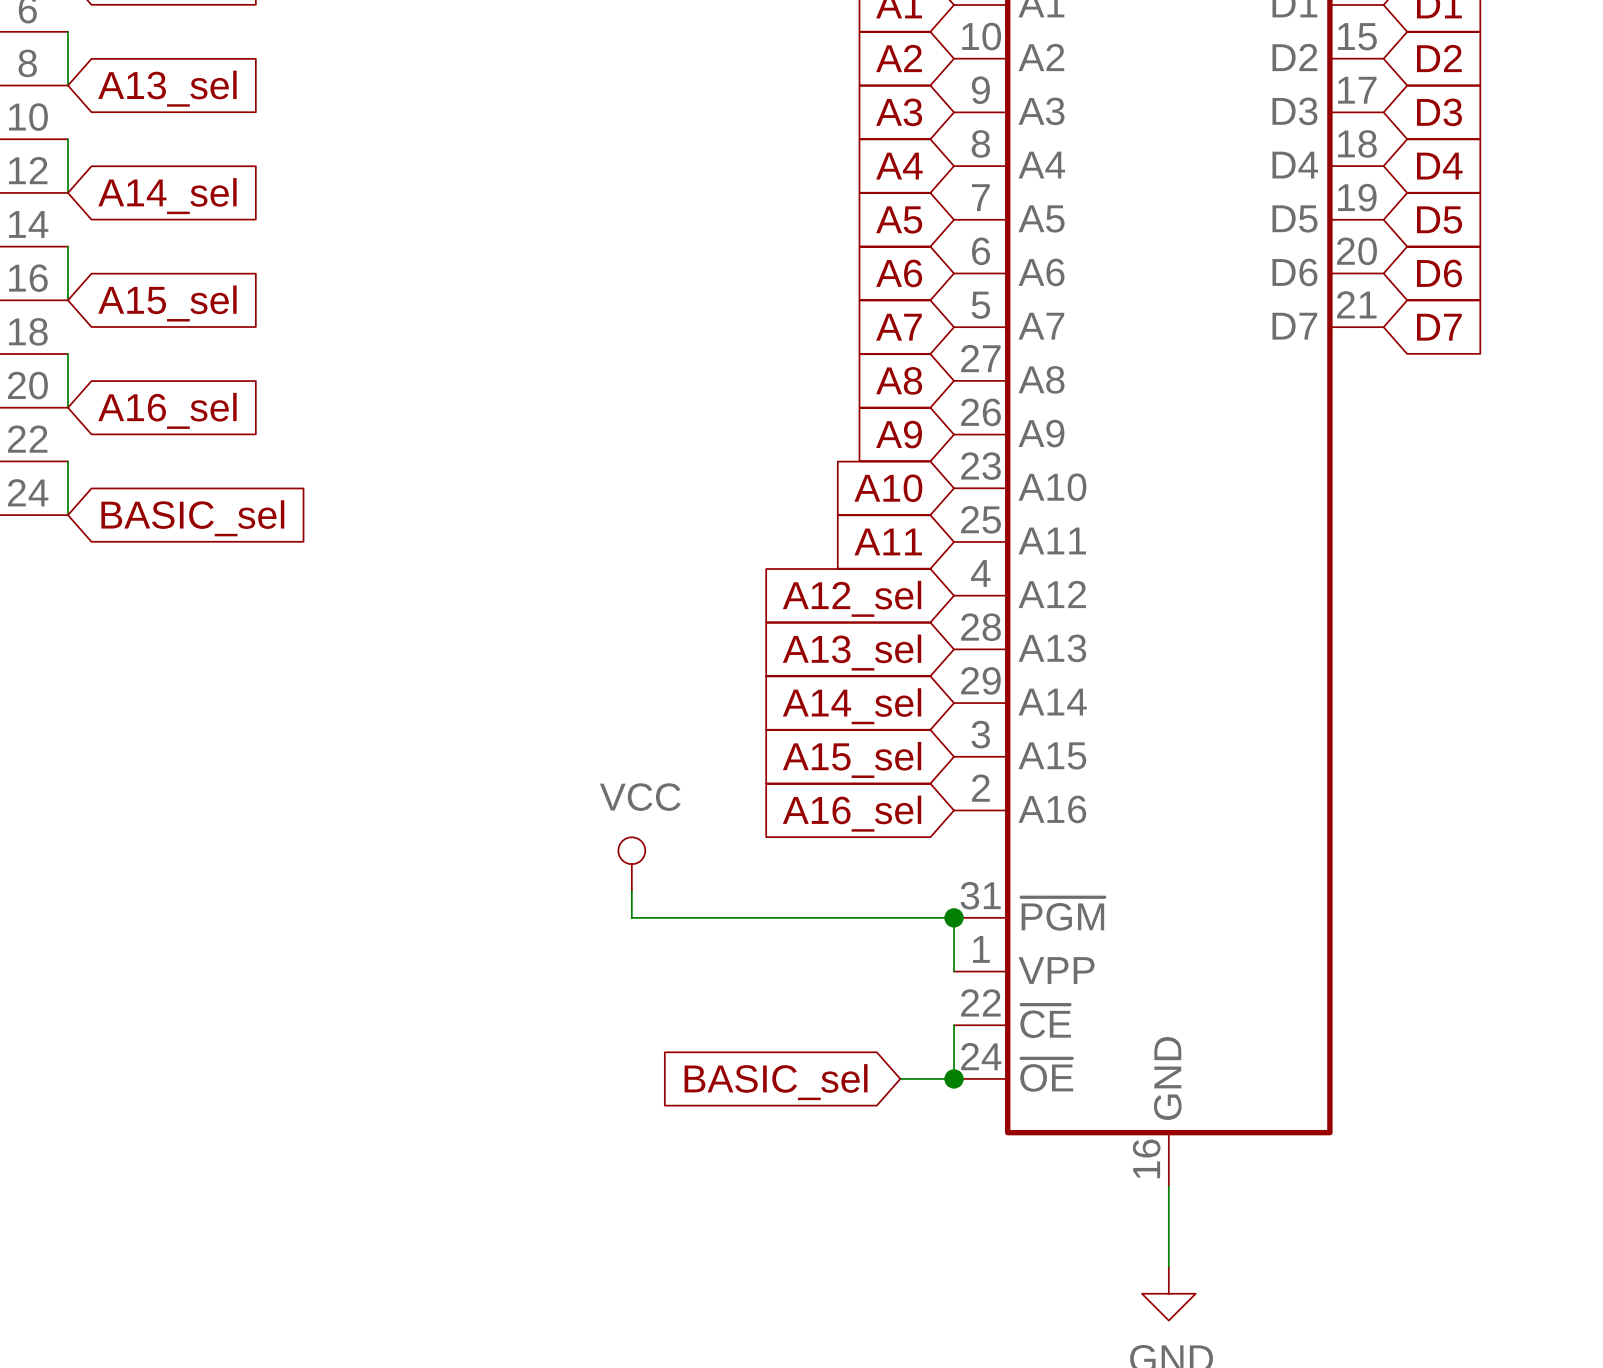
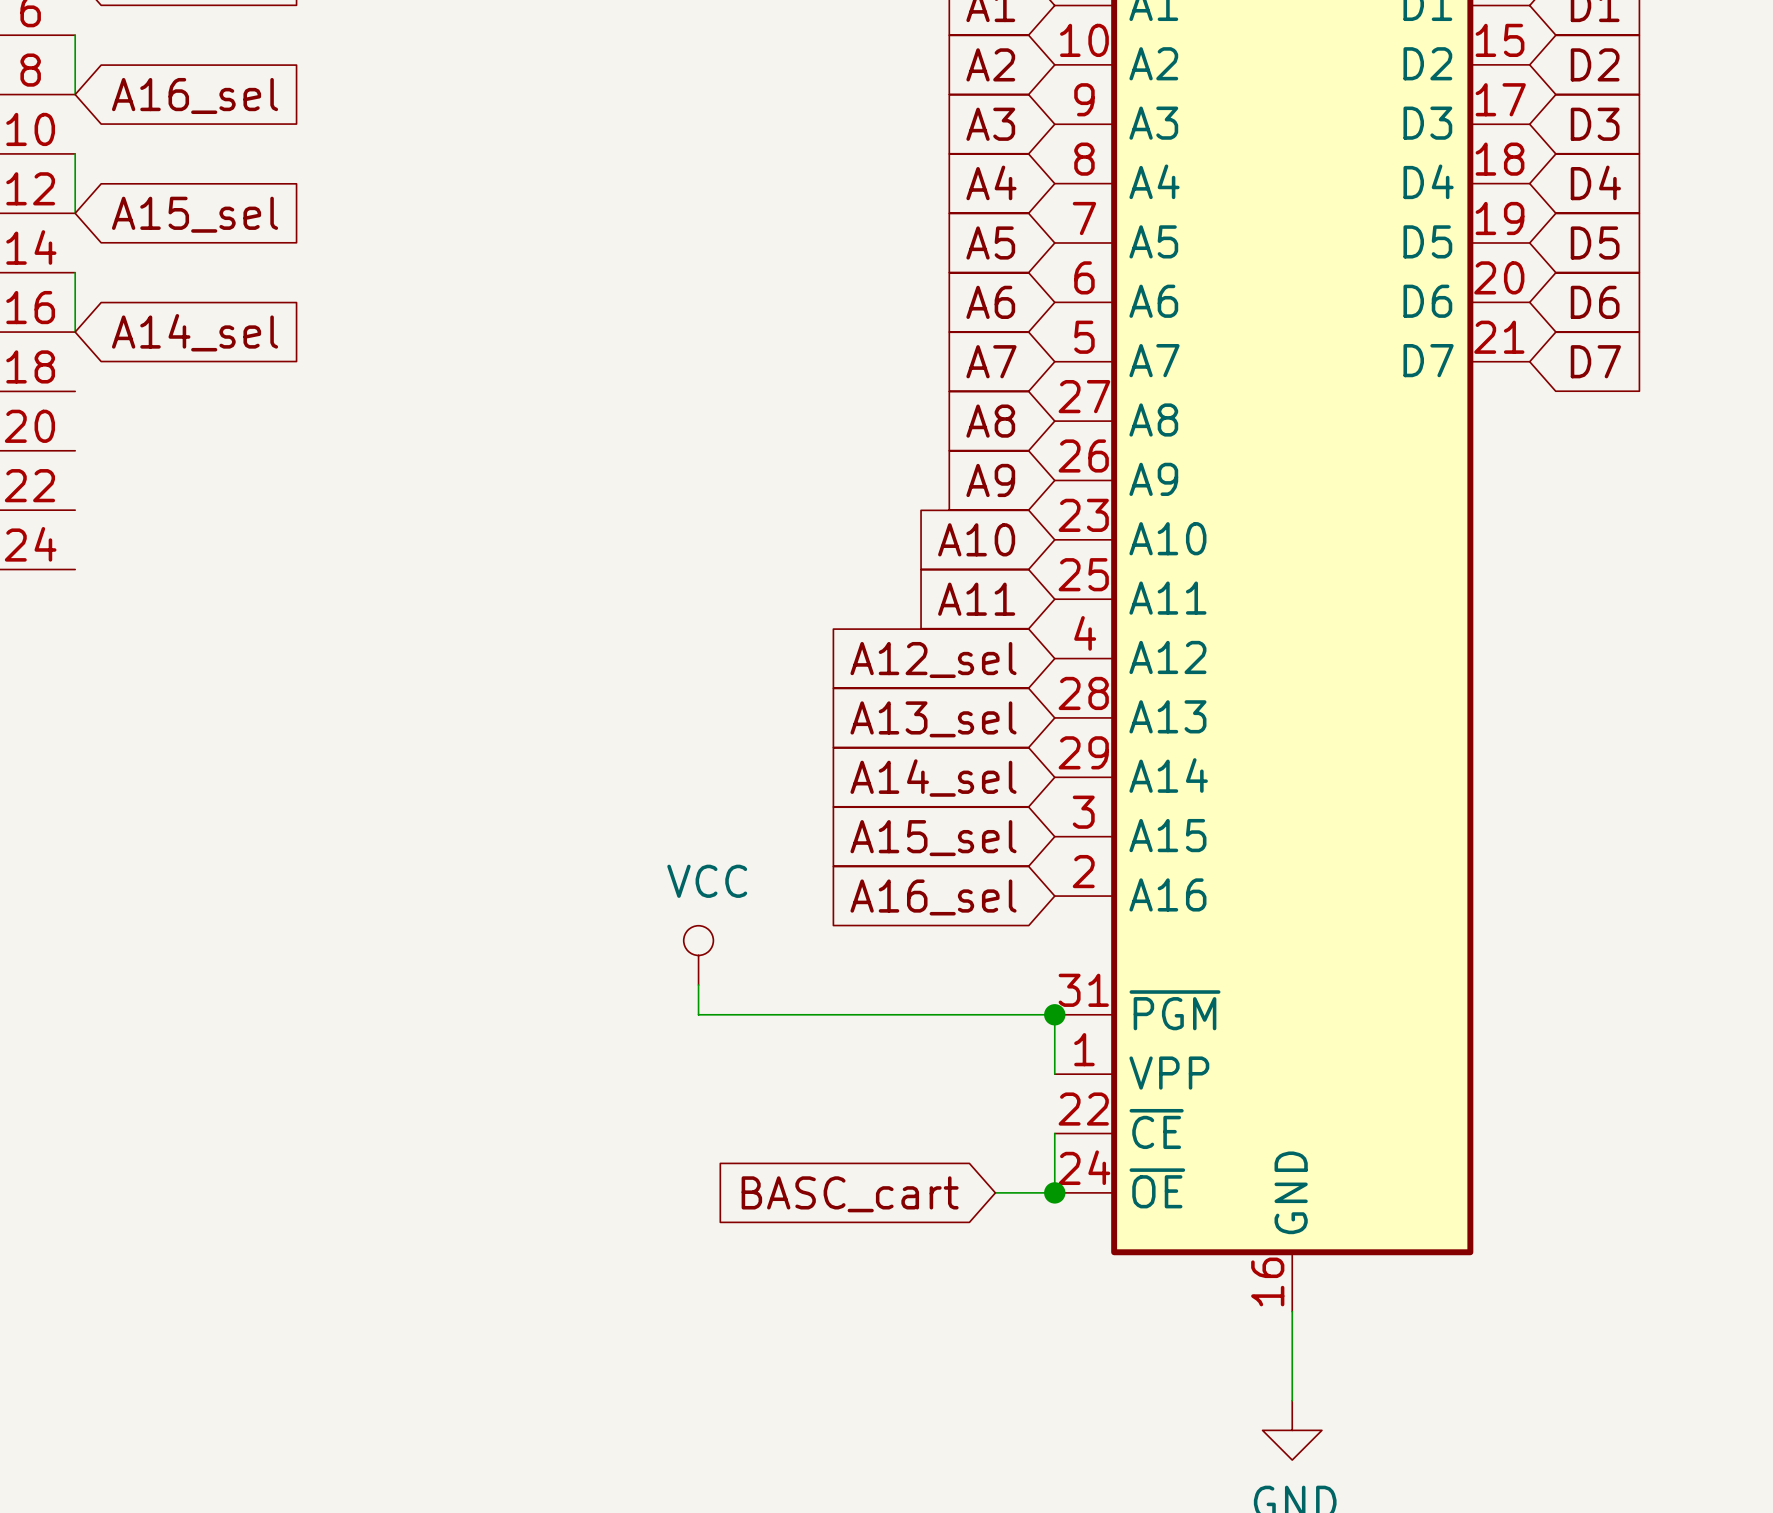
global label: A13_sel (167, 88) -> A16_sel (195, 95)
global label: A14_sel (167, 196) -> A15_sel (195, 214)
global label: A15_sel (167, 303) -> A14_sel (195, 332)
wire: (68, 354) (68, 407) -> none
global label: A16_sel (167, 410) -> none
wire: (68, 461) (68, 515) -> none
global label: BASIC_sel (192, 518) -> none
global label: BASIC_sel (776, 1082) -> BASC_cart (850, 1194)

